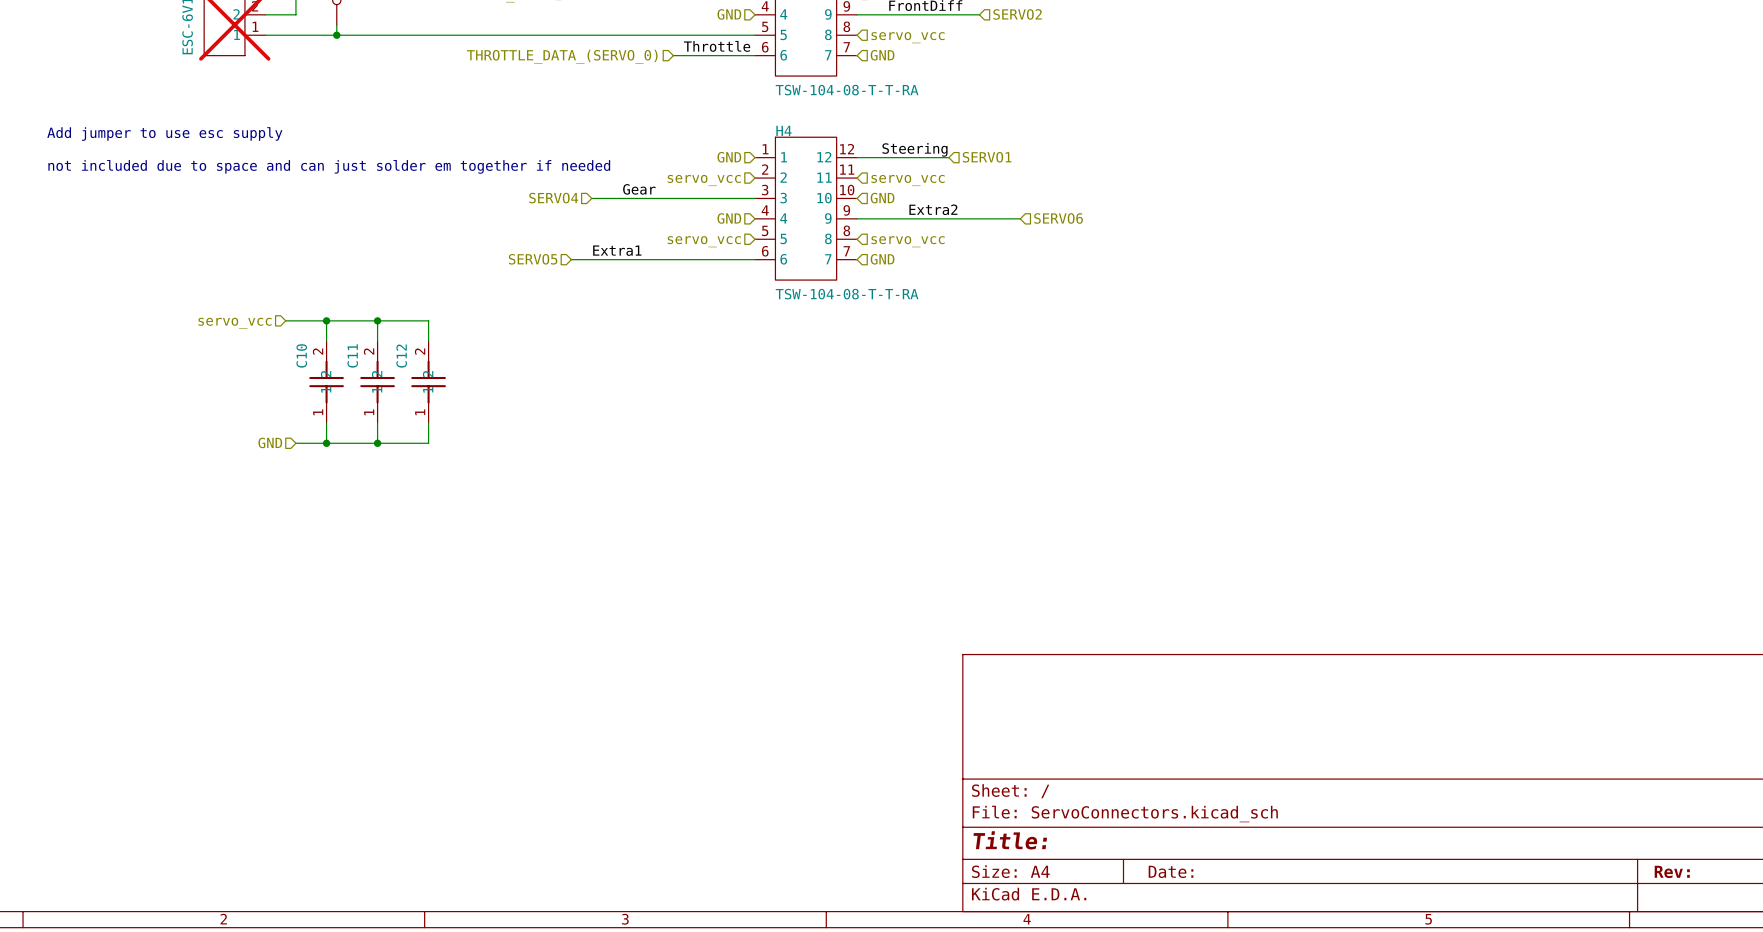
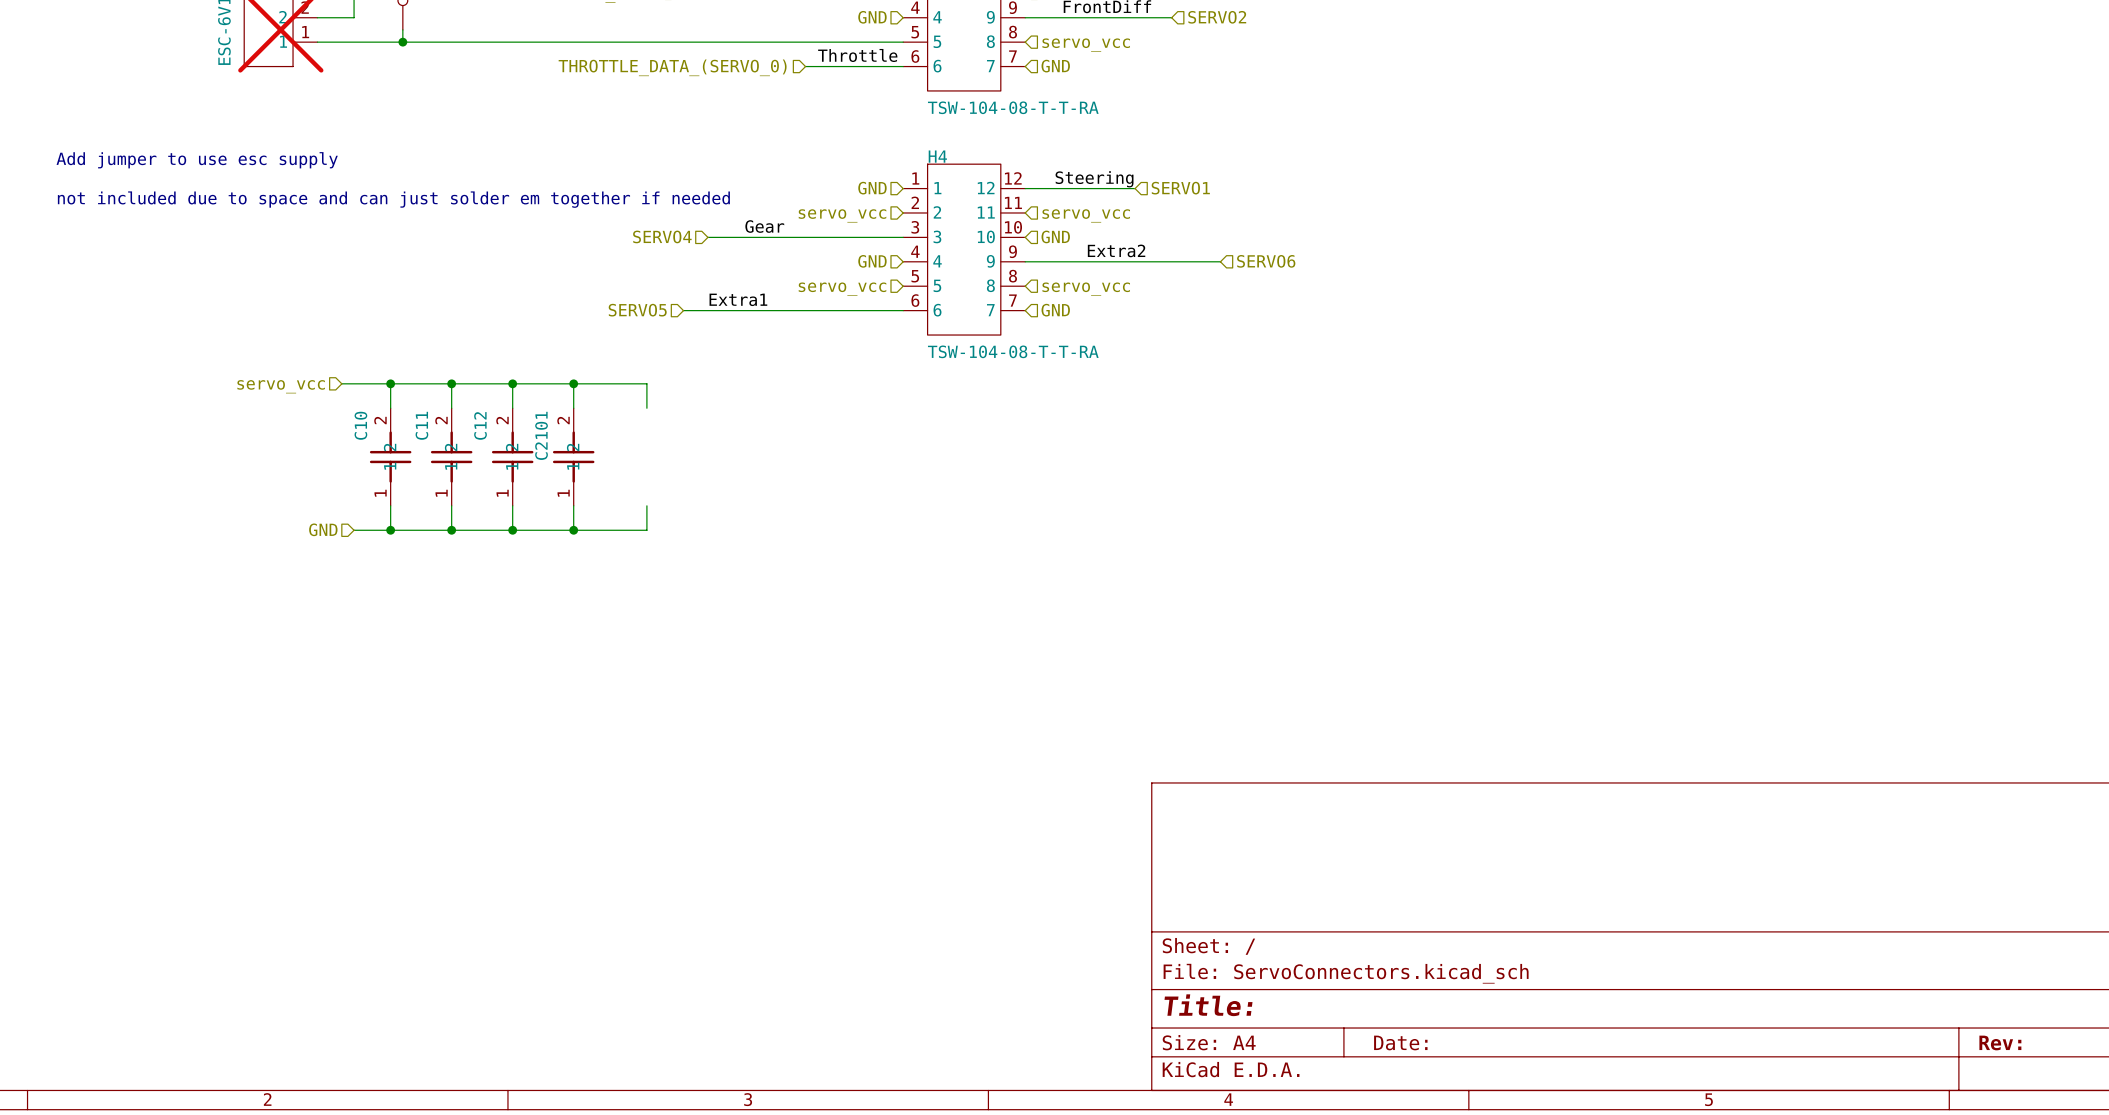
wire: none -> (512, 383) (646, 383) (646, 408)
junction: none -> (512, 383)
wire: none -> (573, 383) (573, 408)
junction: none -> (573, 383)
C2101: none -> (573, 457)
wire: none -> (573, 505) (573, 530)
wire: none -> (646, 505) (646, 530) (512, 530)
junction: none -> (512, 530)
junction: none -> (573, 530)

